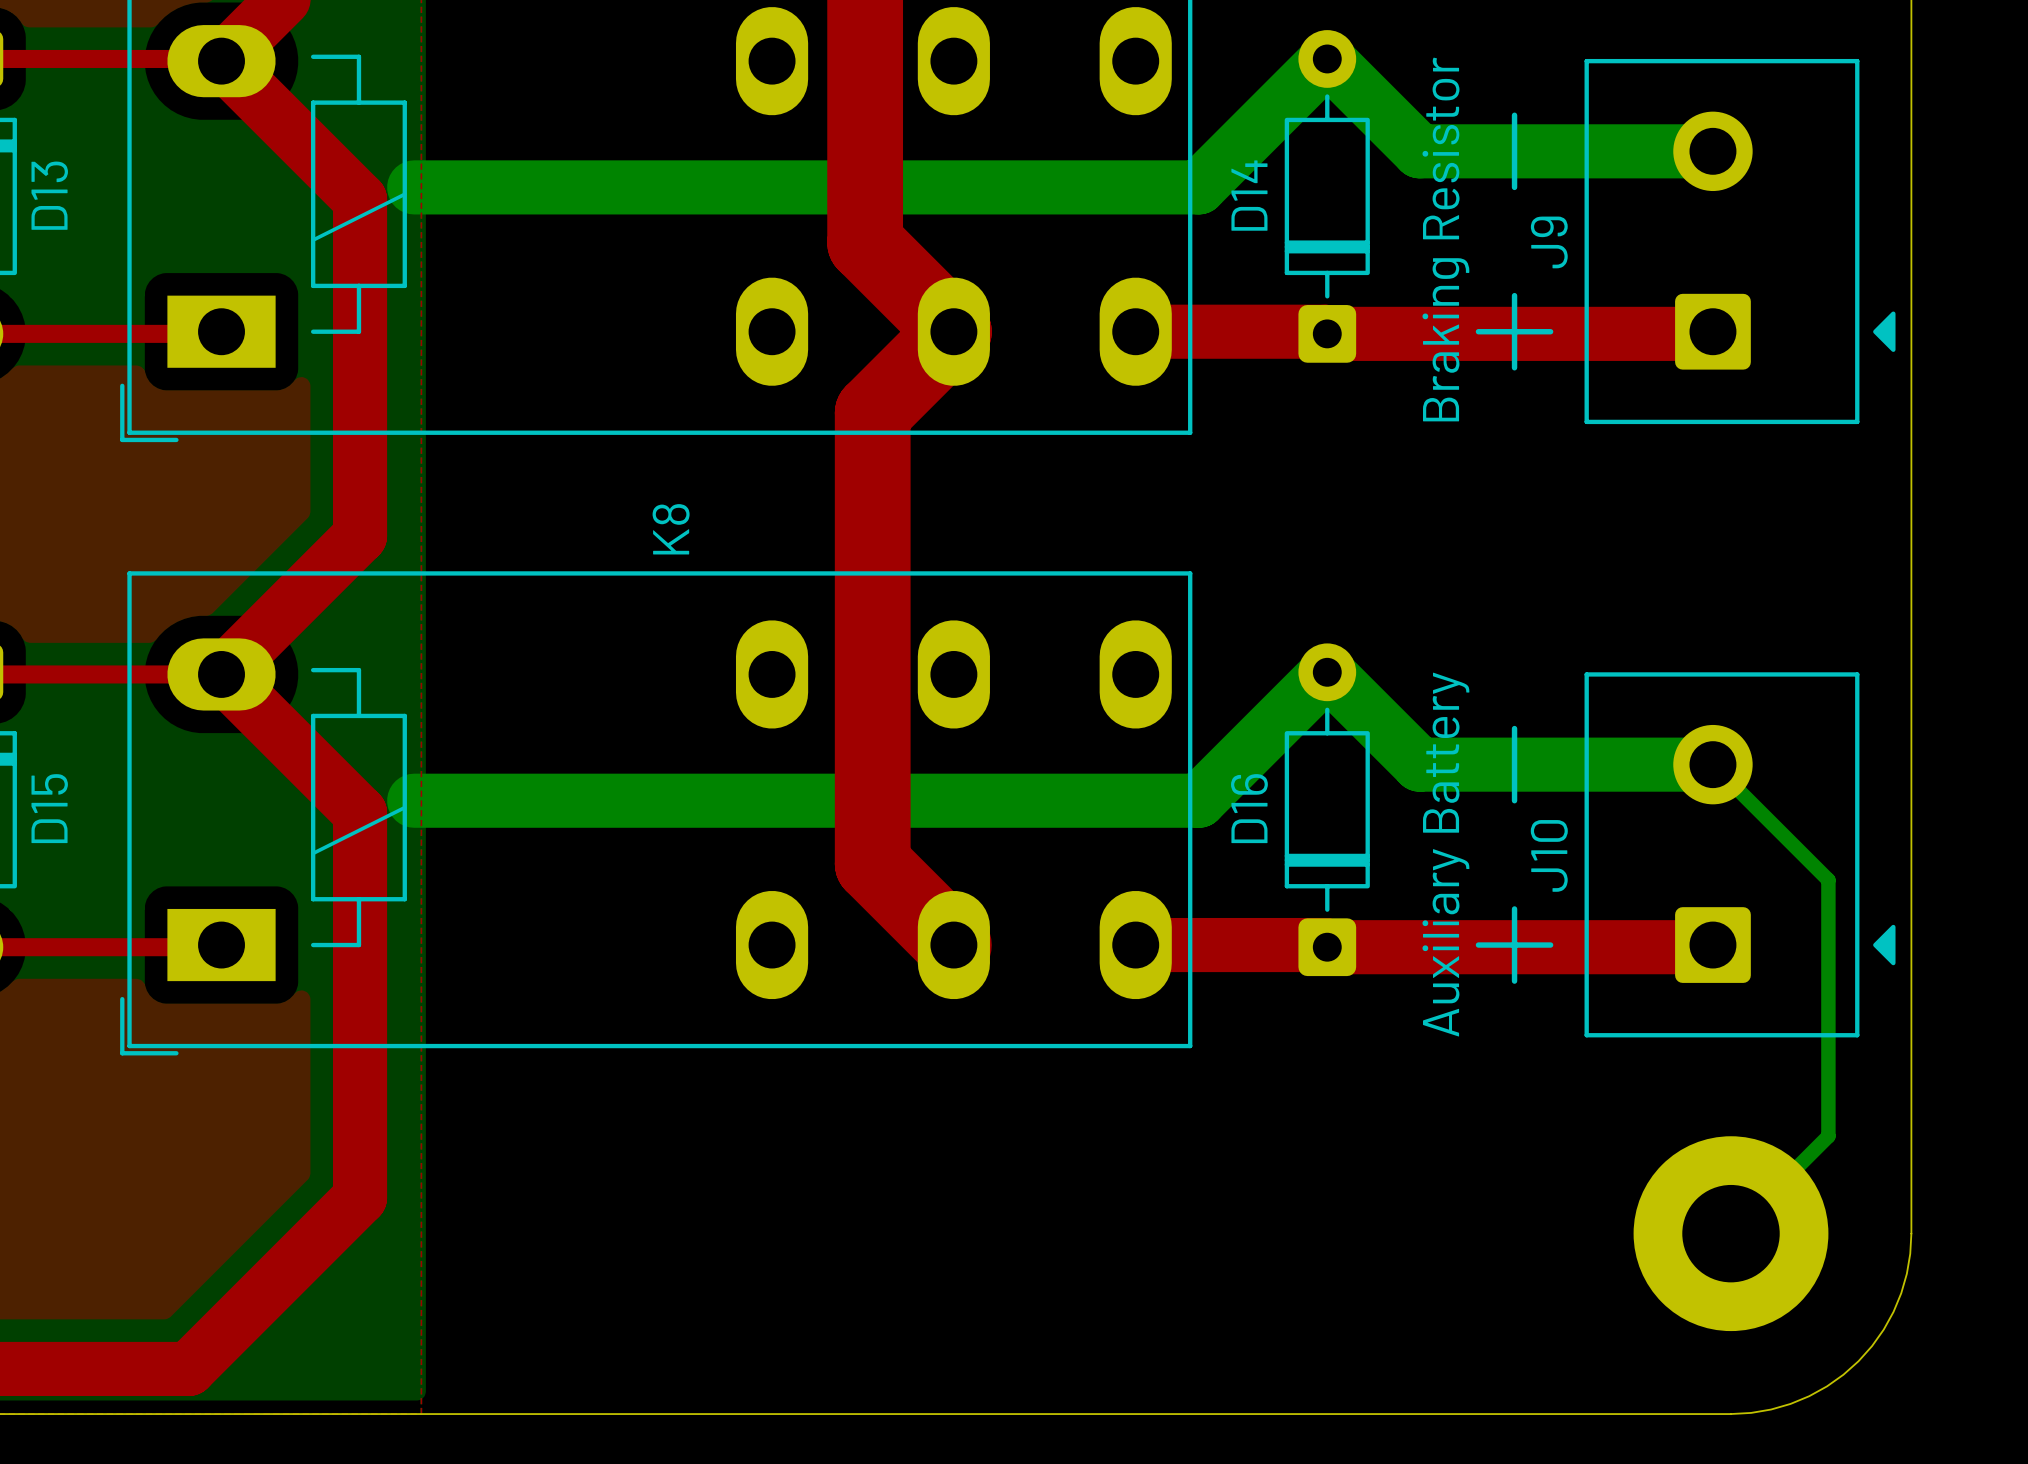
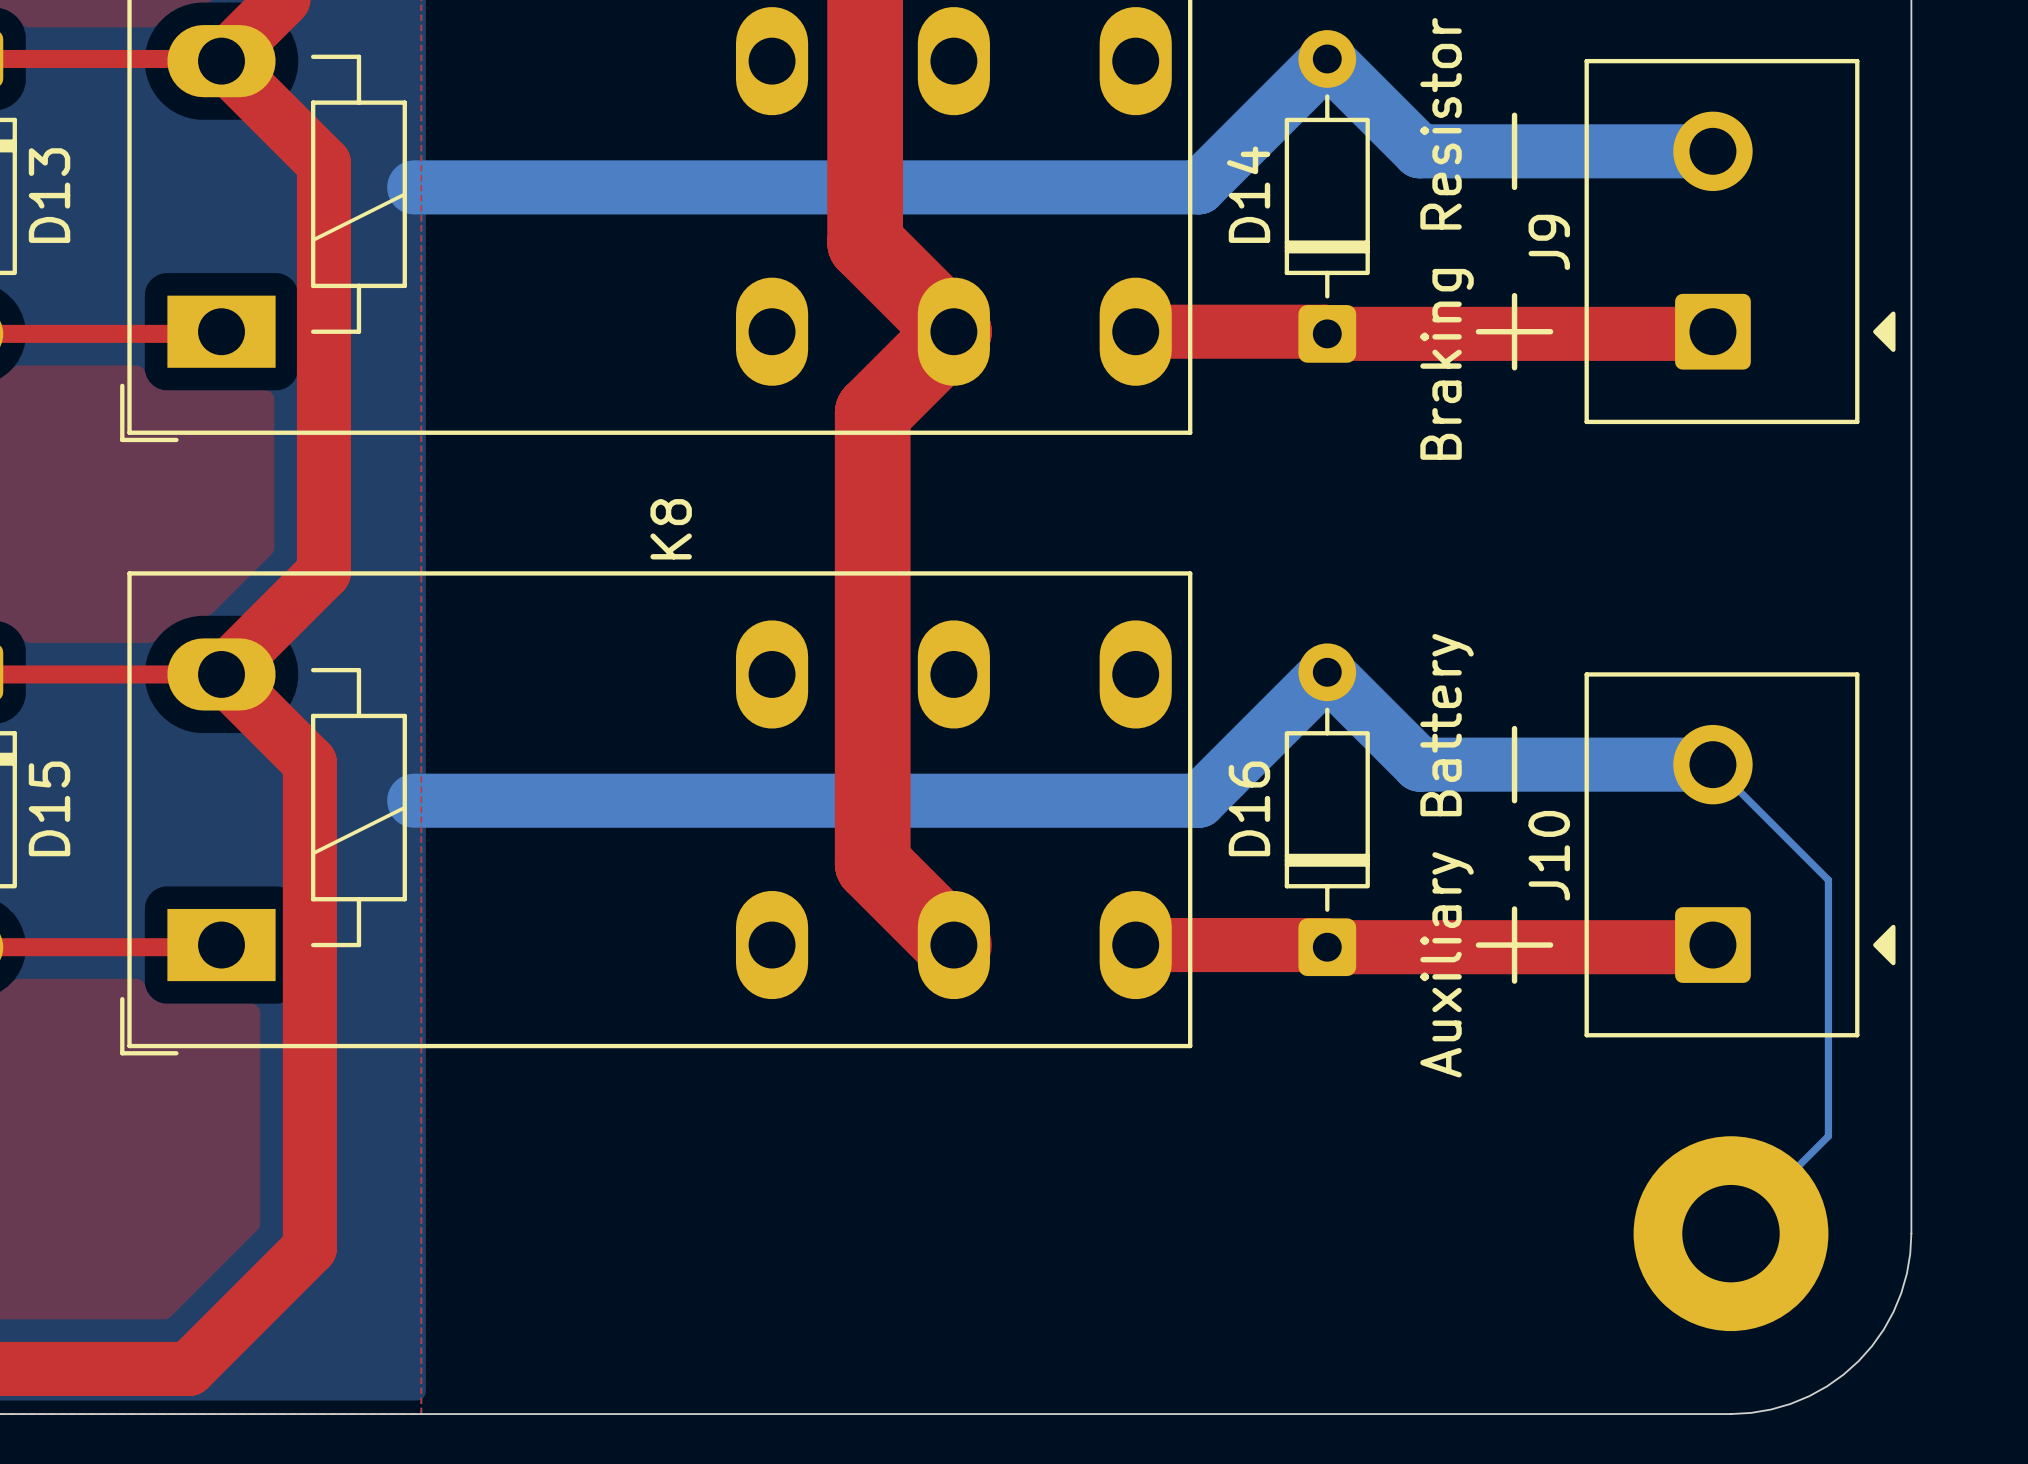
top track: (323, 163) (360, 199) (360, 535) (323, 571) -> (323, 163) (323, 571)
top track: (309, 762) (360, 812) (360, 1197) (309, 1247) -> (309, 762) (309, 1247)
bottom track width: thick (1712, 764) (1828, 880) (1828, 1136) (1731, 1233) -> thin (1712, 764) (1828, 880) (1828, 1136) (1731, 1233)

